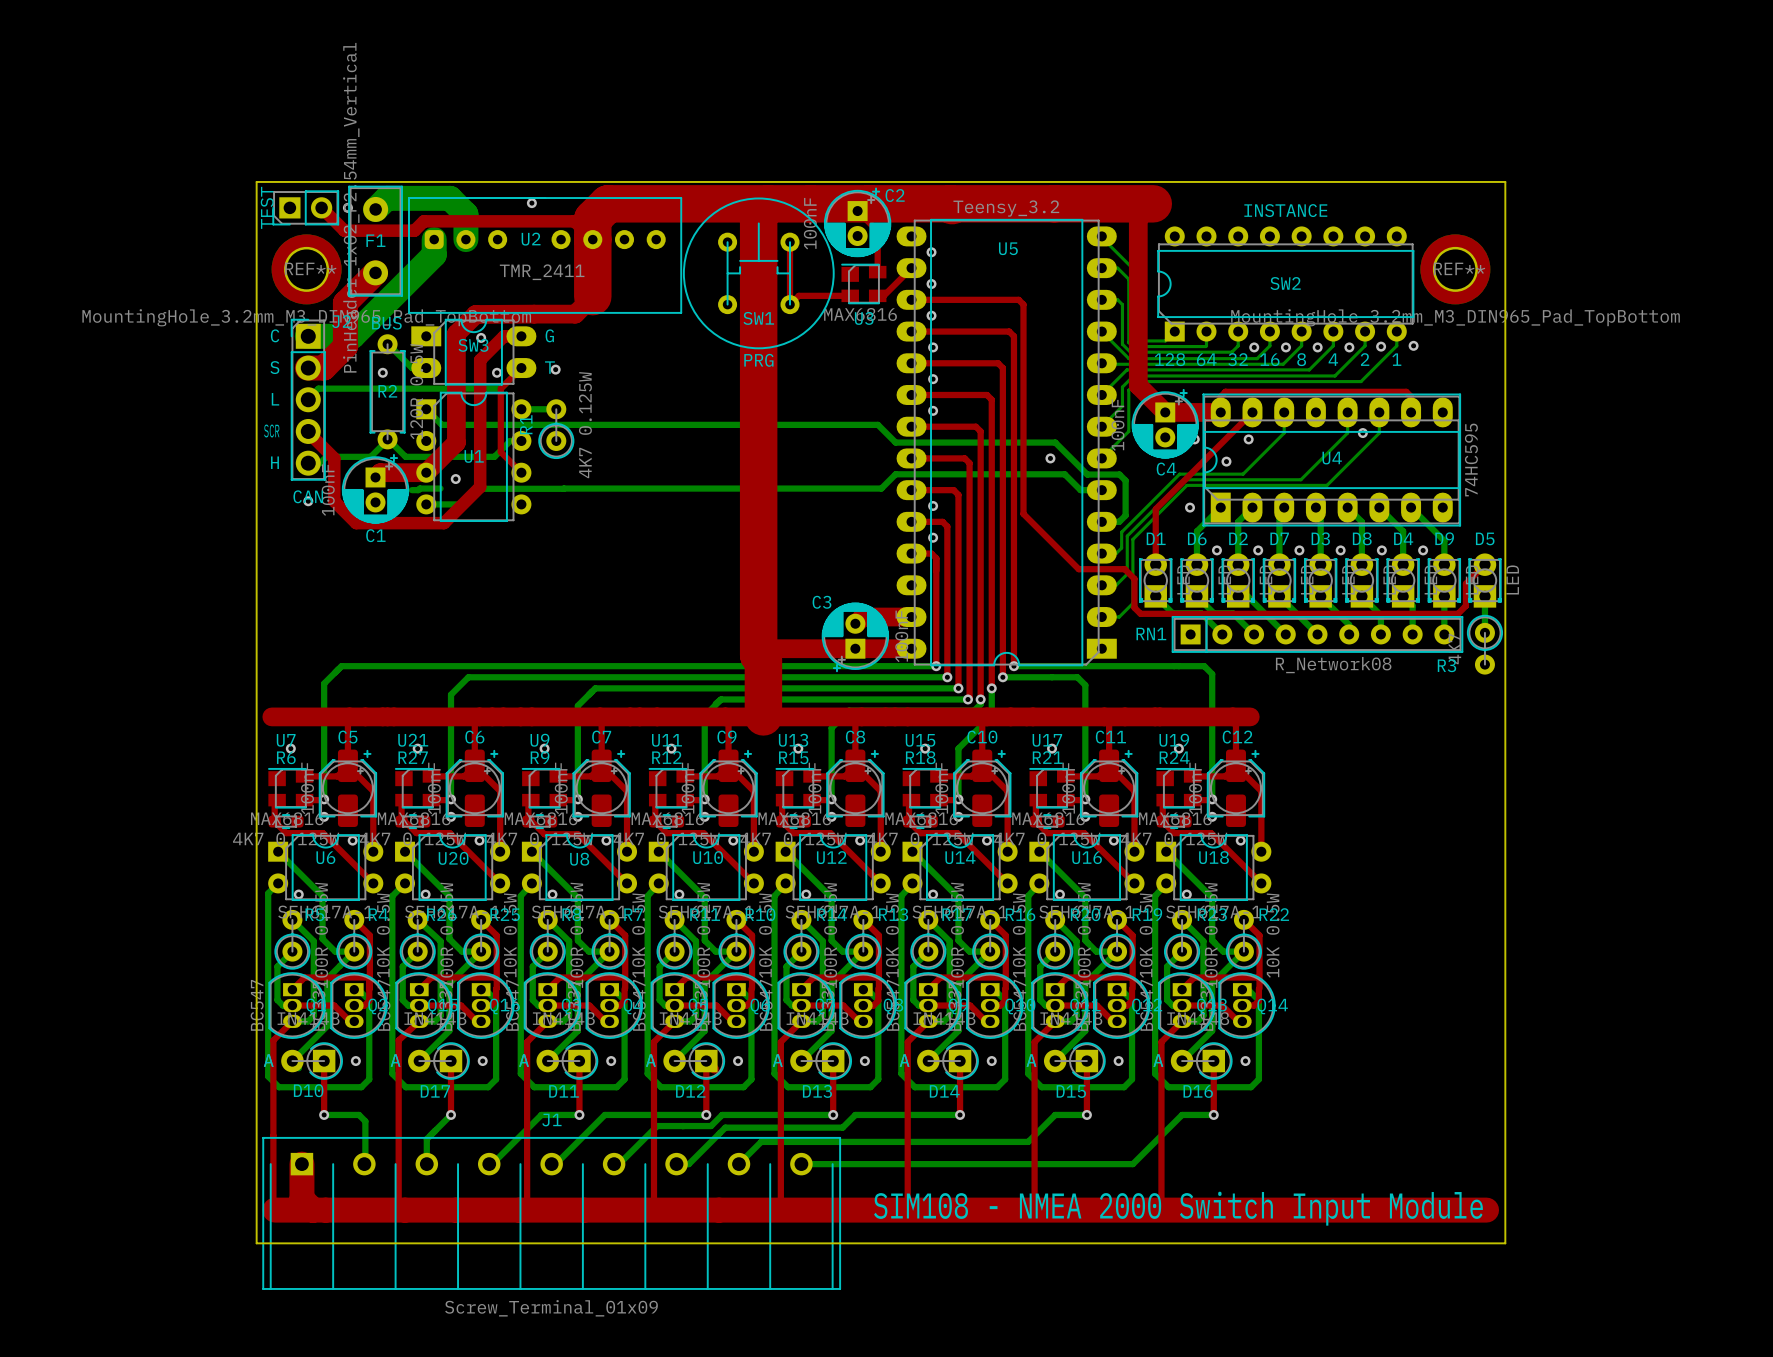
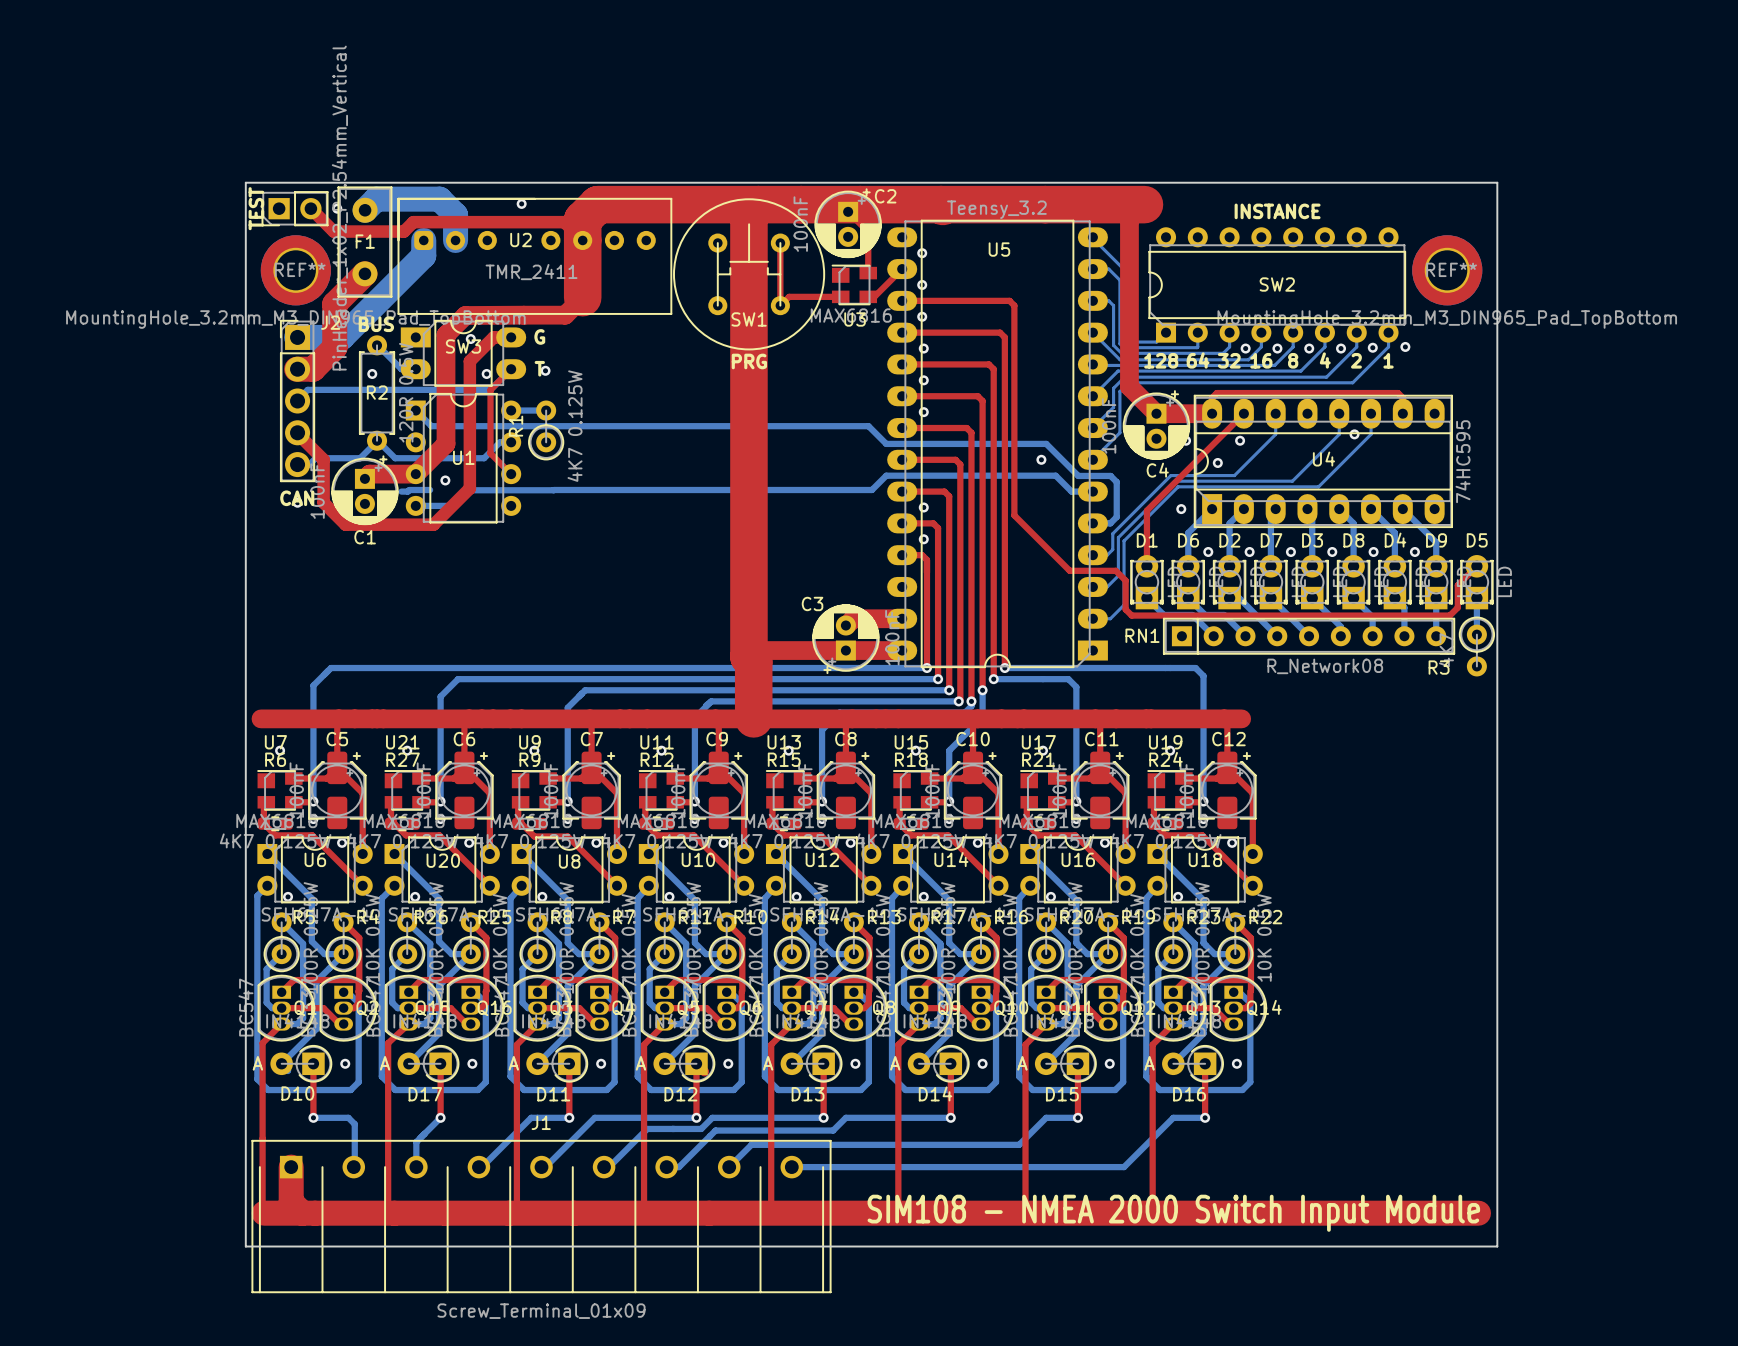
text: C (275, 335) -> none
text: S (274, 367) -> none
text: L (275, 399) -> none
text: SCR (271, 431) -> none
text: H (274, 462) -> none

